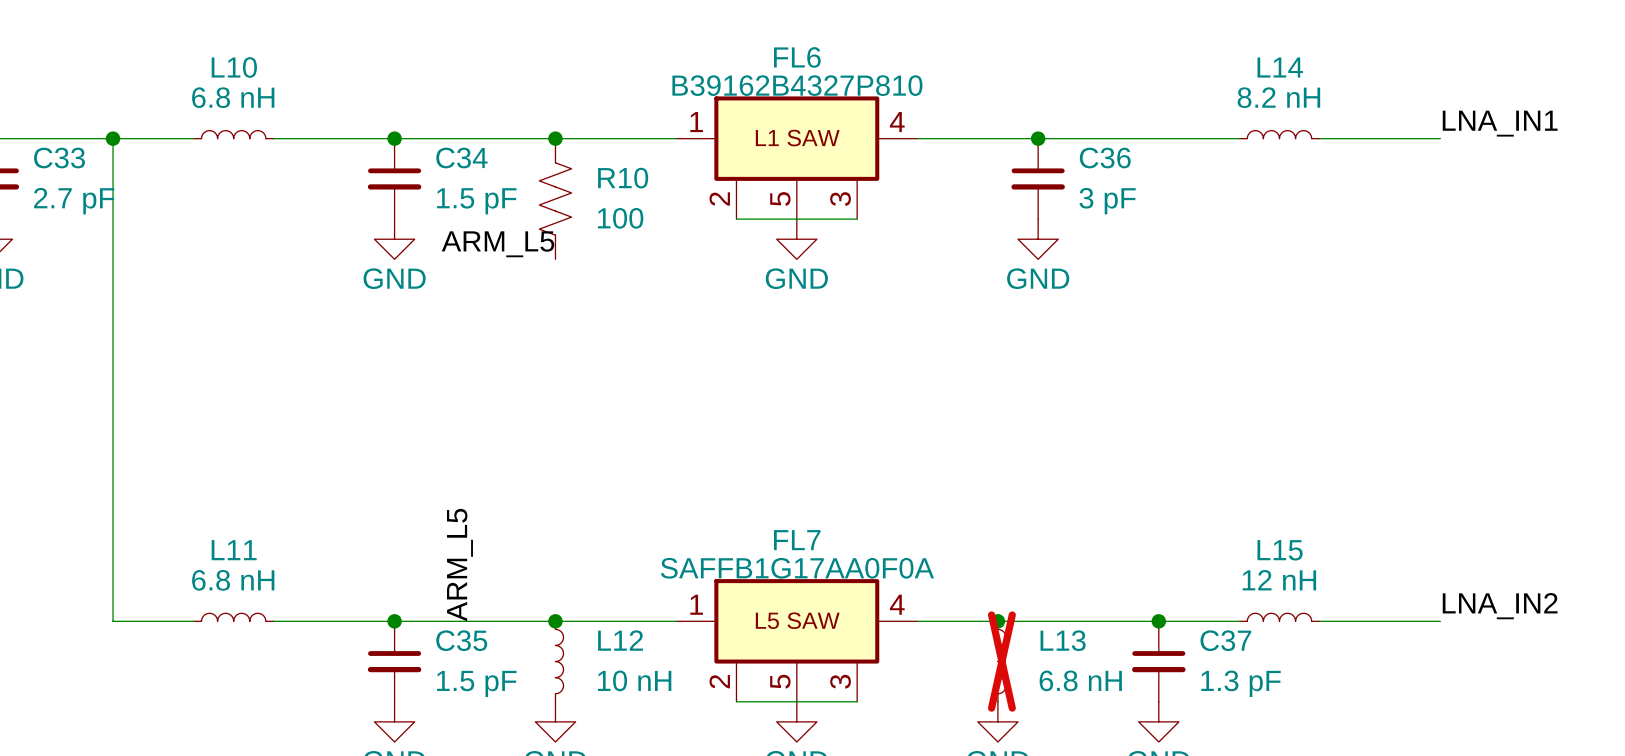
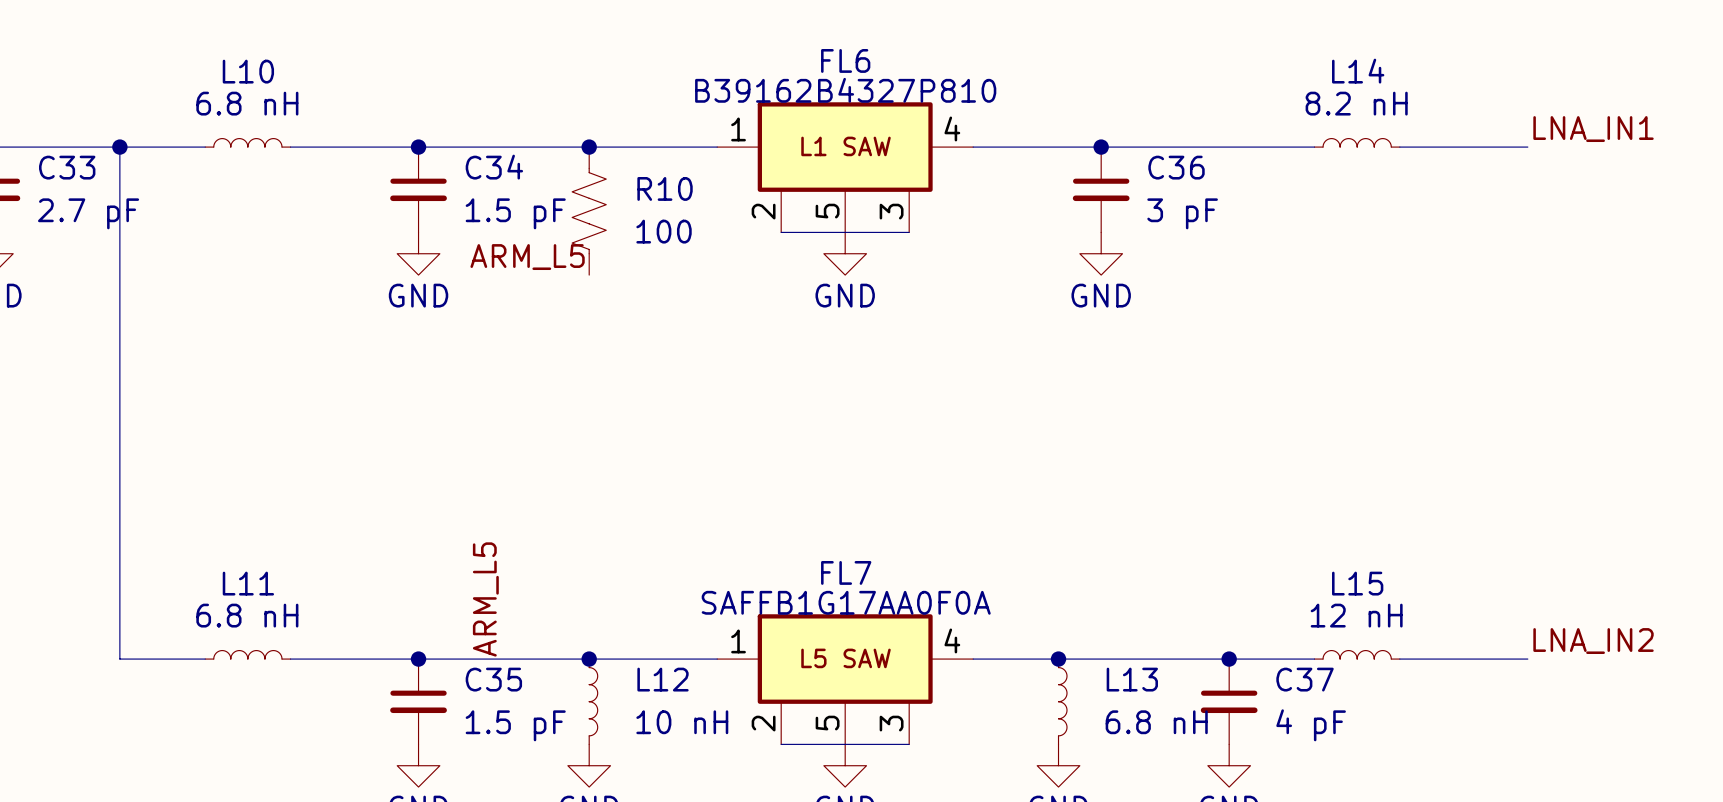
L13 do-not-place cross: (1001, 661) -> none
C37 value: 1.3 pF (1241, 683) -> 4 pF (1311, 725)

